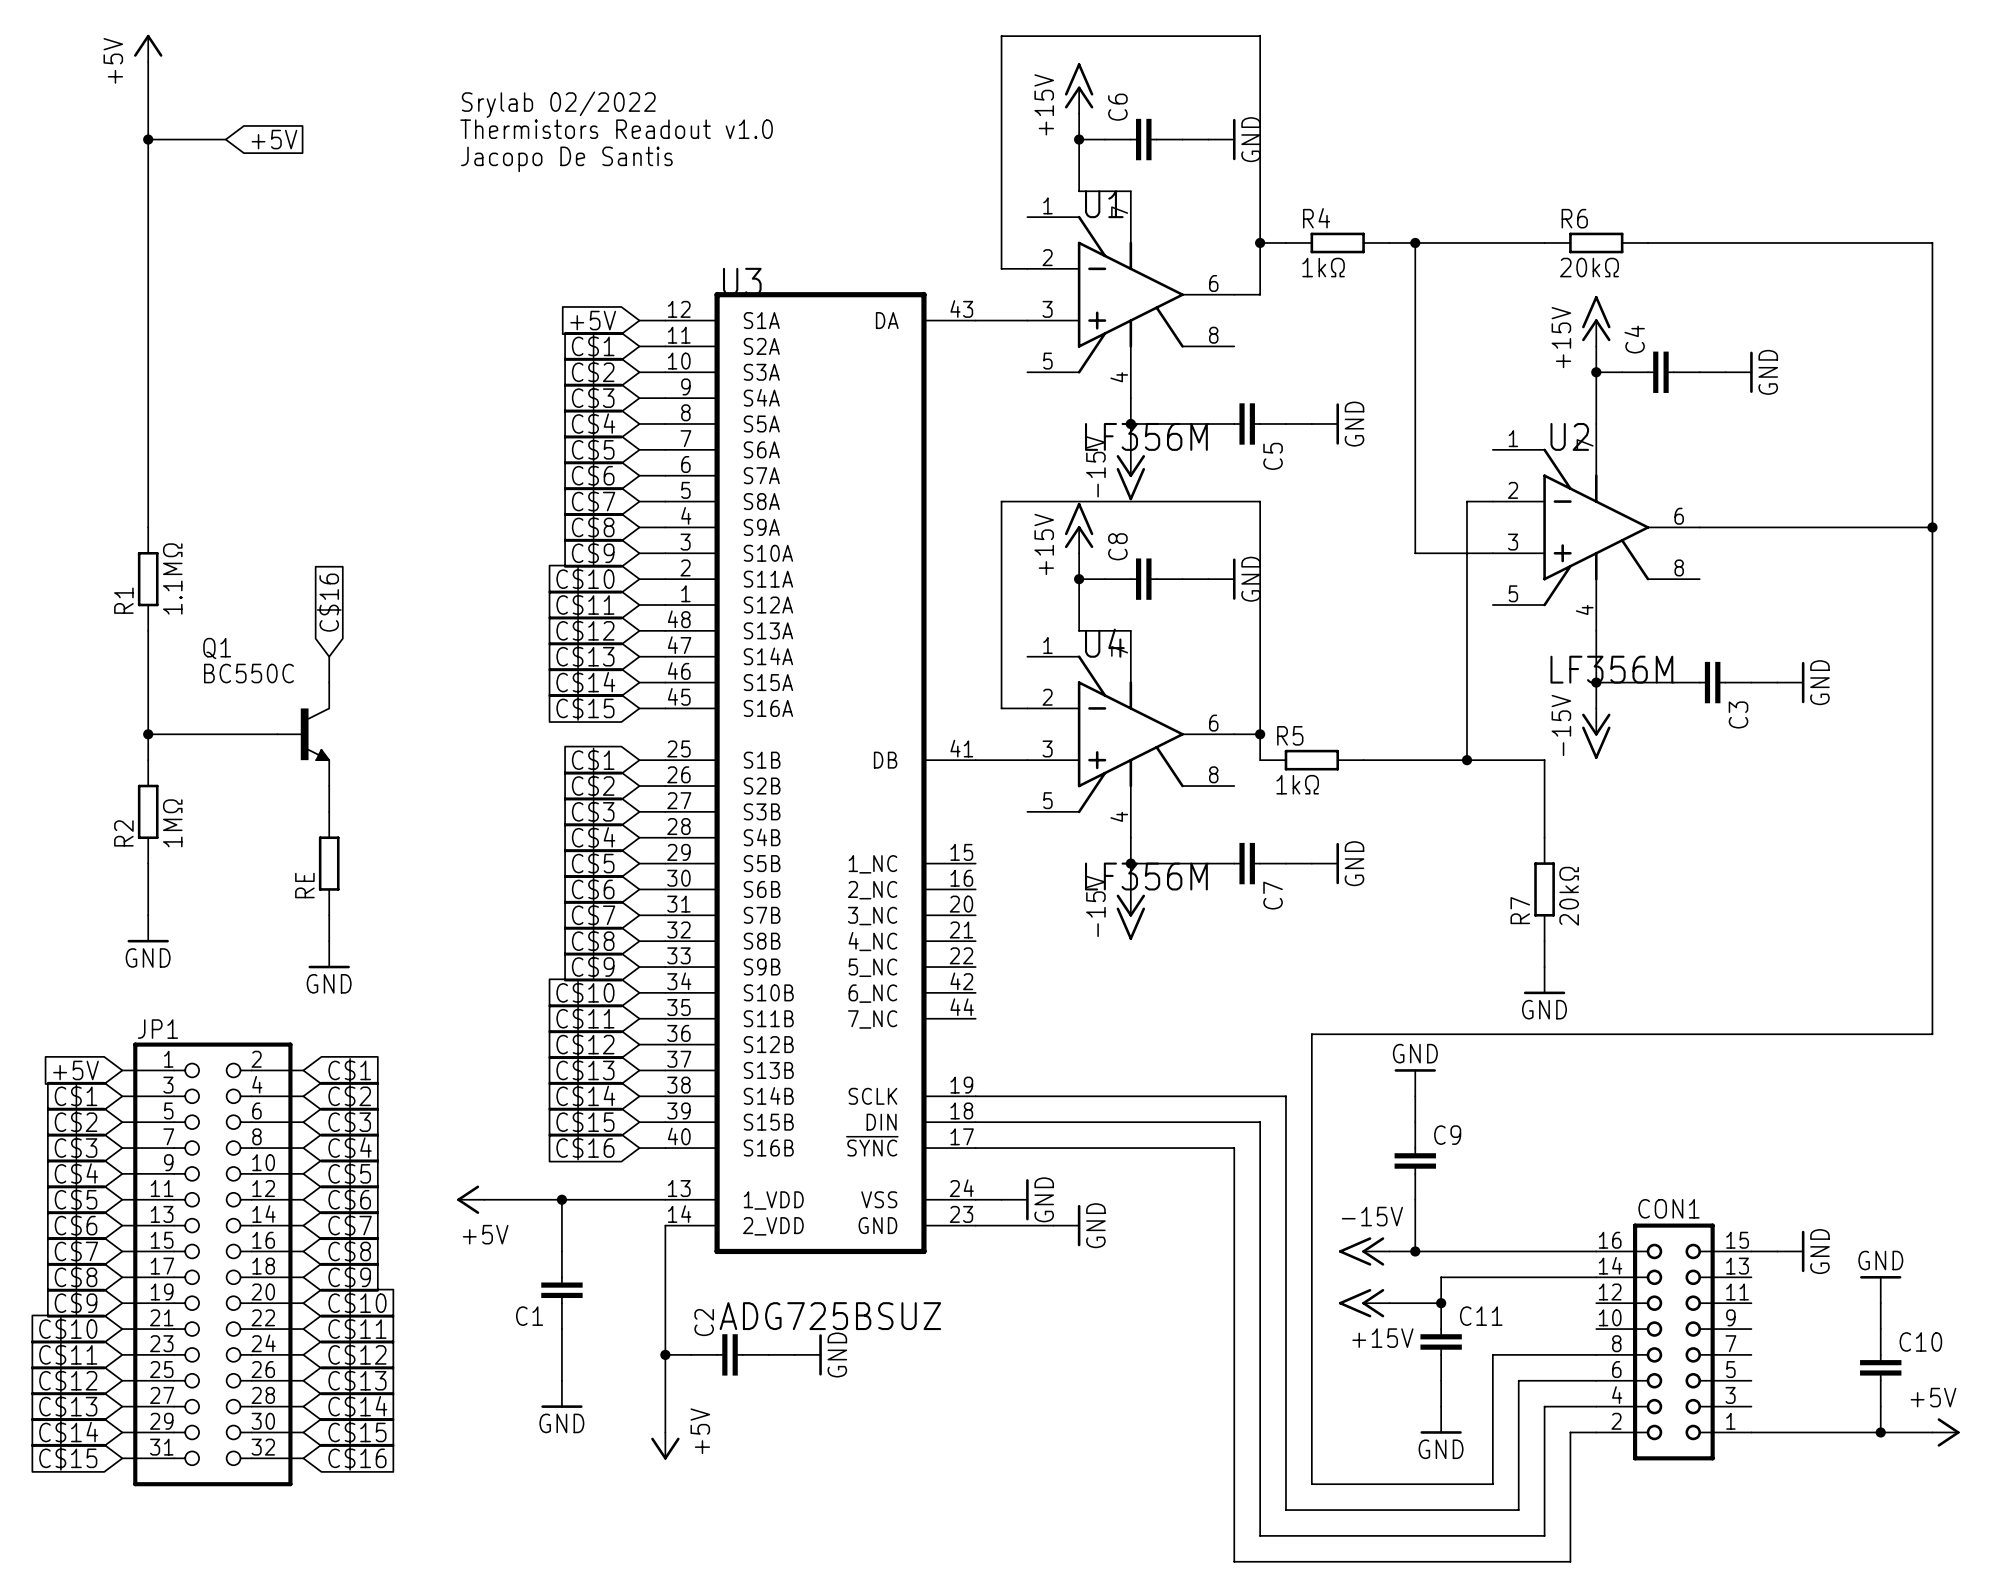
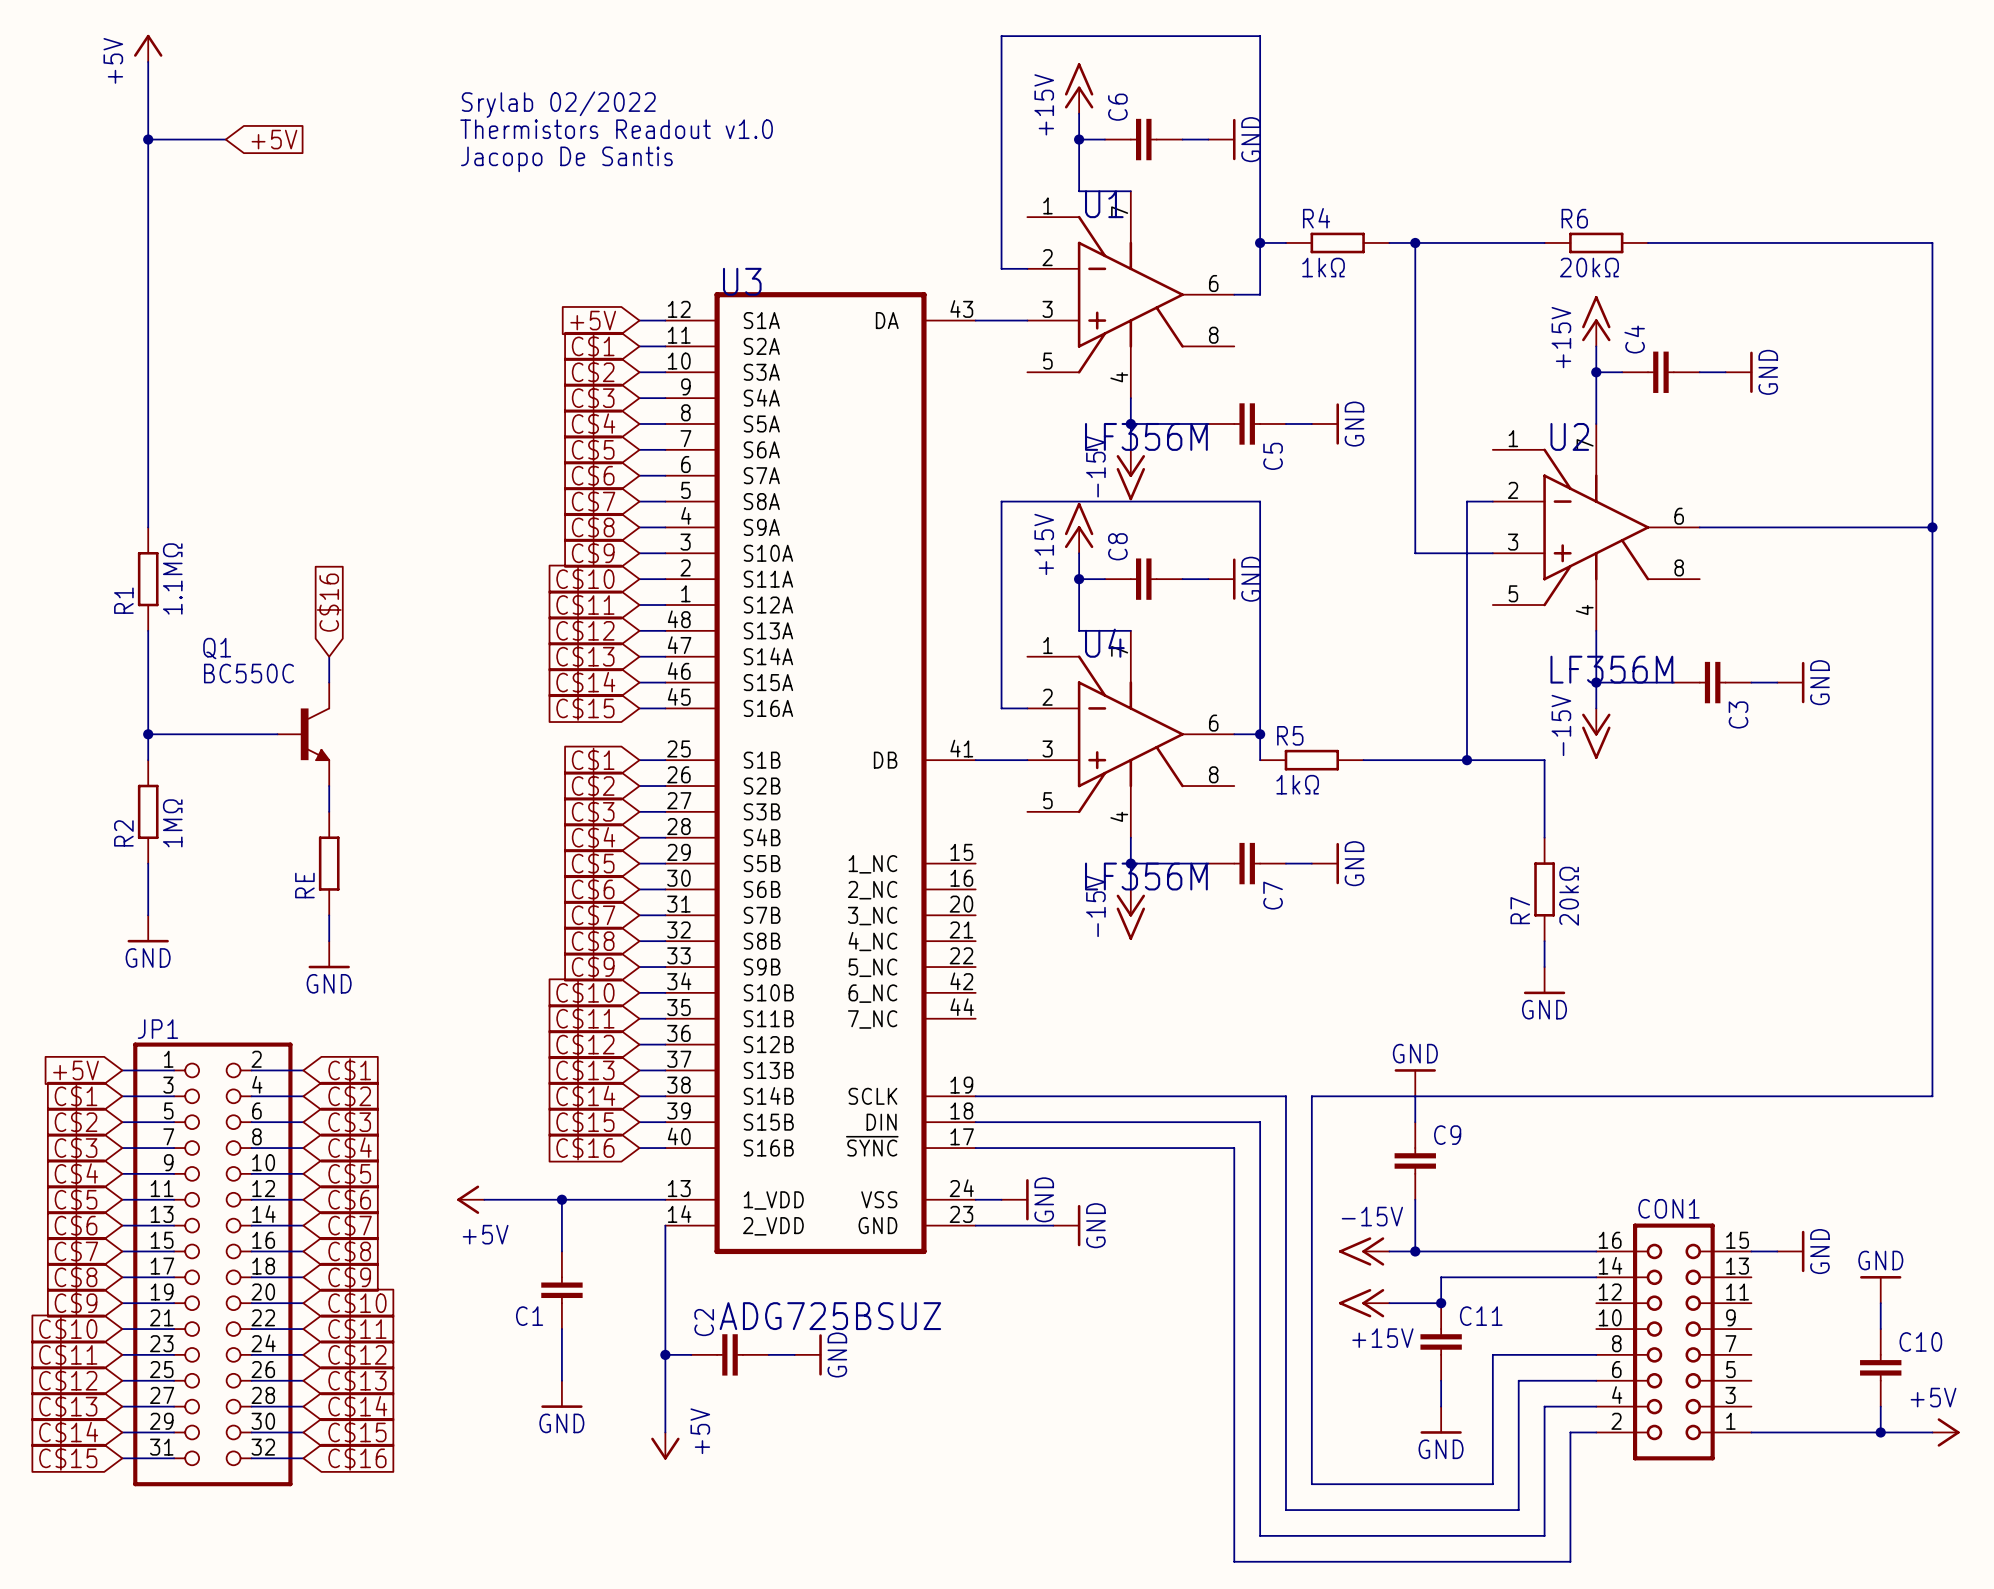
wire: (1932, 1034) (1311, 1034) (1311, 1096) -> (1932, 1034) (1932, 1096) (1311, 1096)

